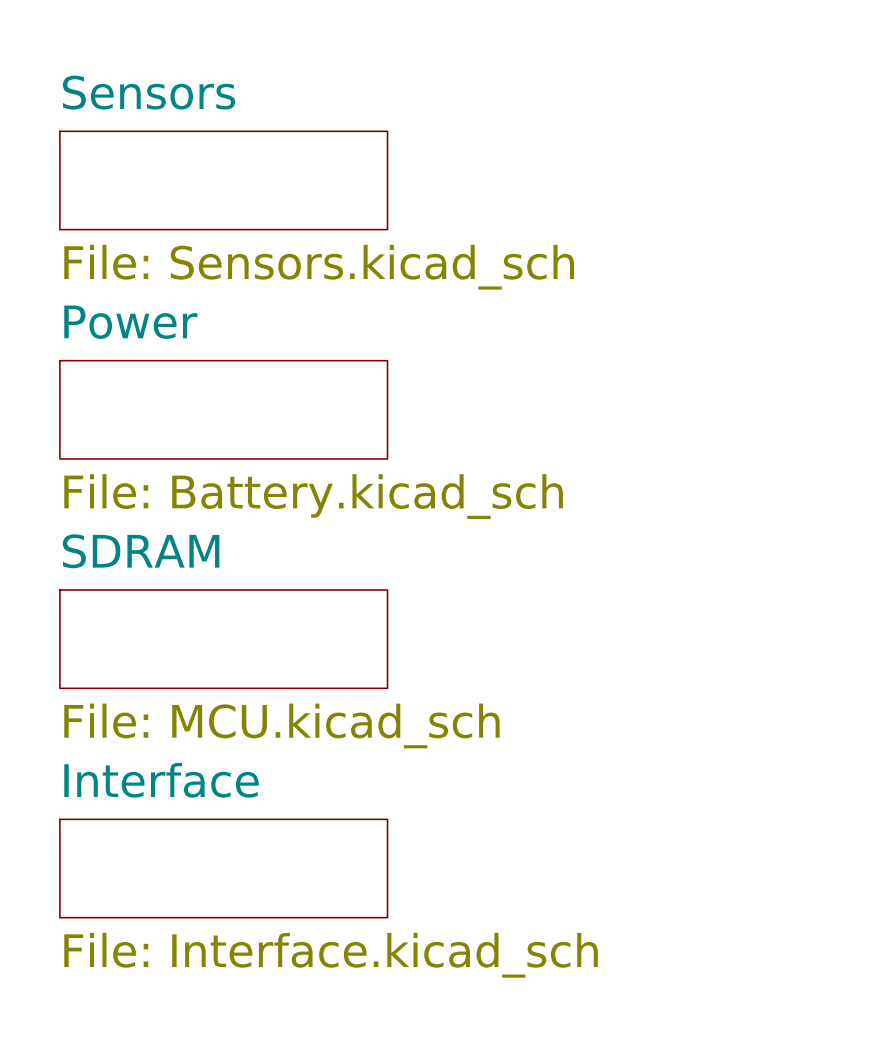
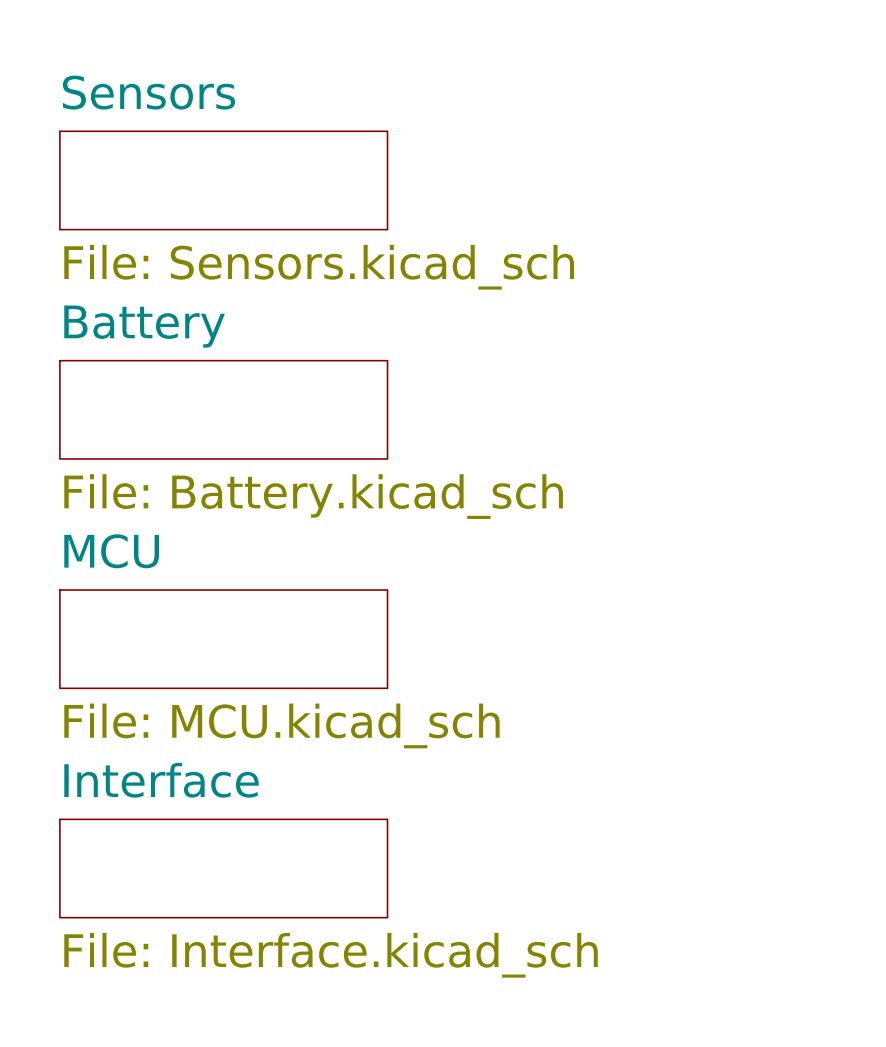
sheet Power name: Power (130, 322) -> Battery (144, 326)
sheet SDRAM name: SDRAM (141, 551) -> MCU (111, 551)

